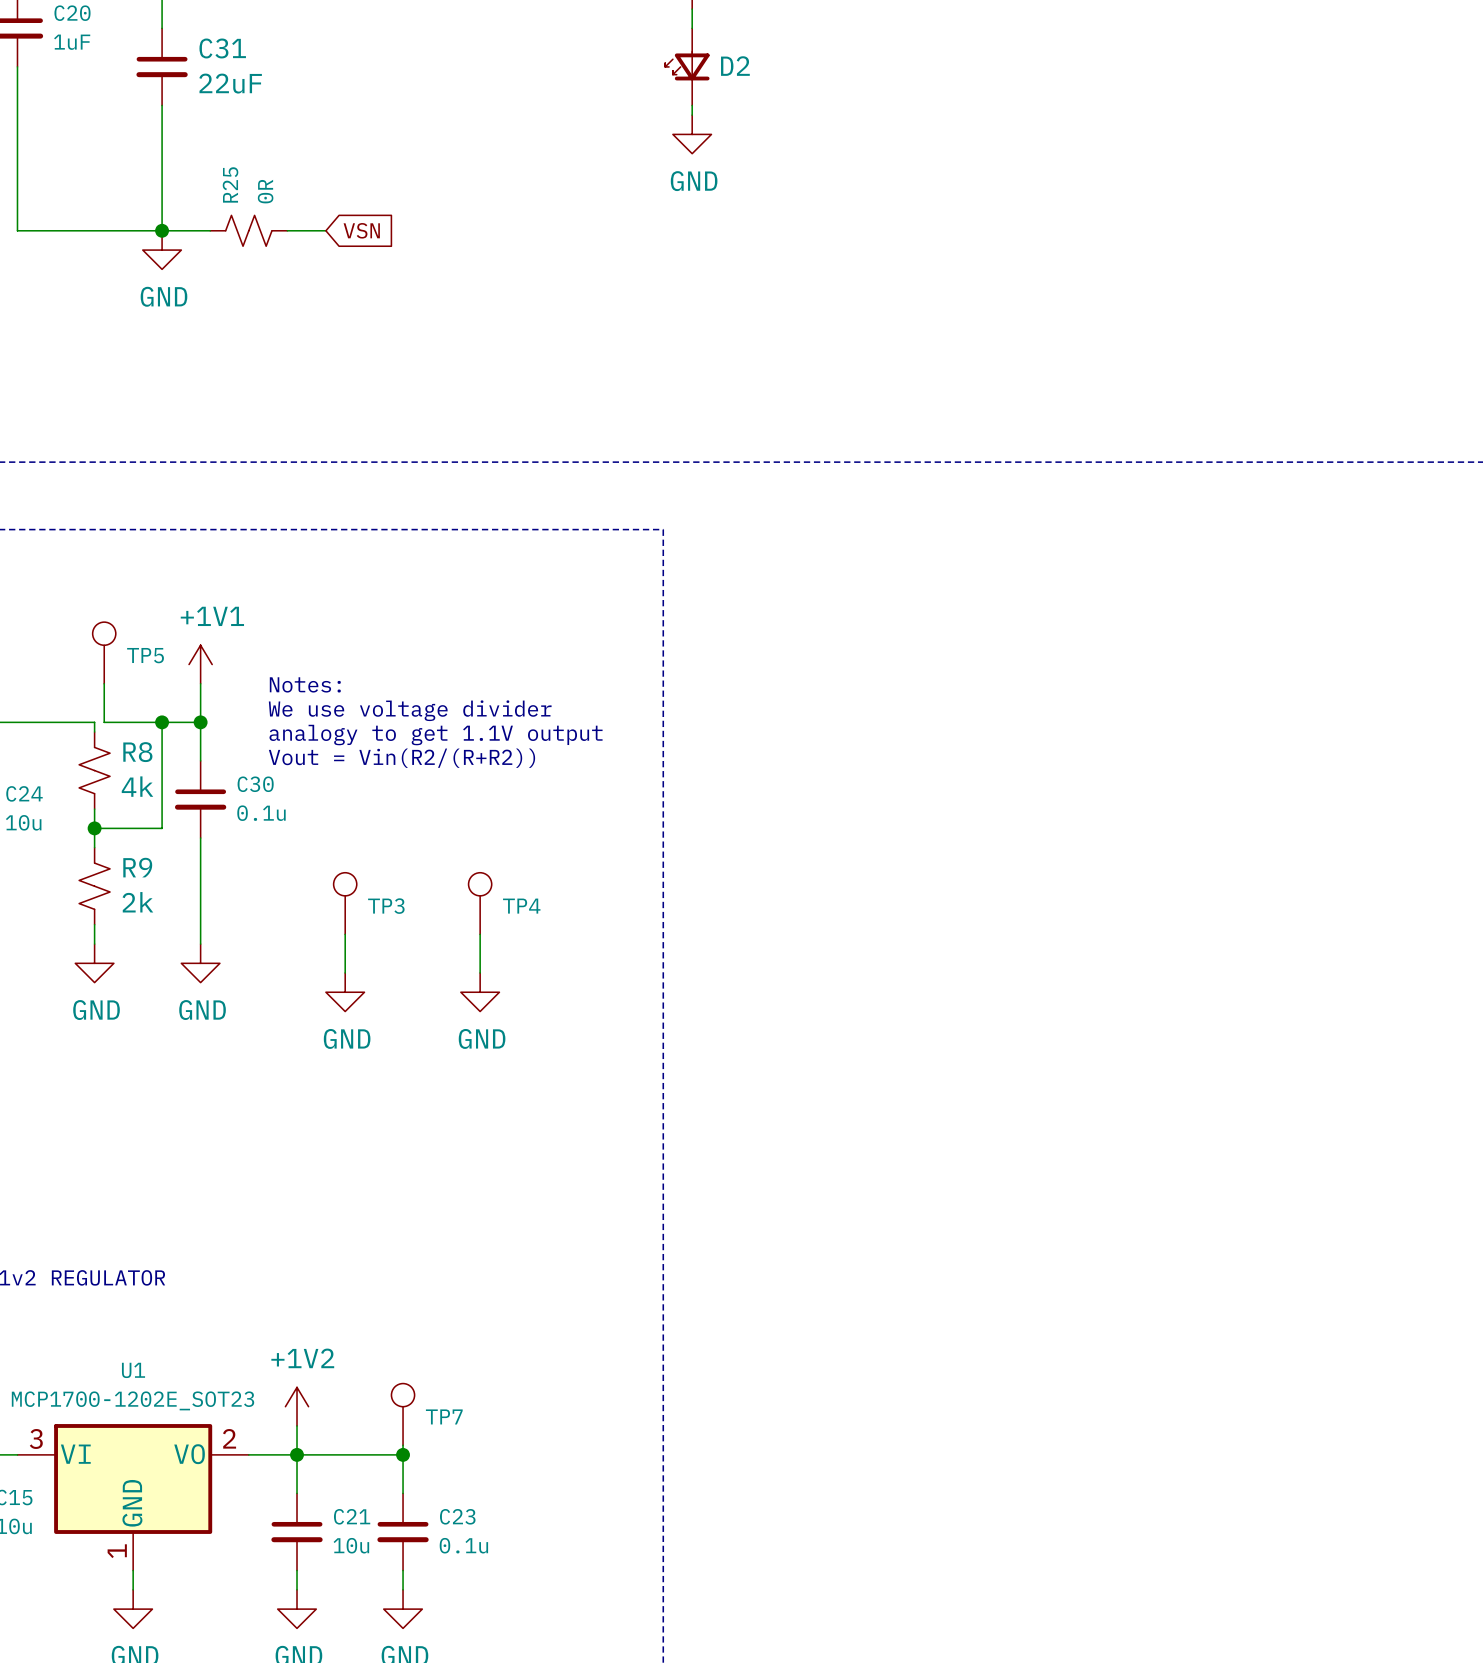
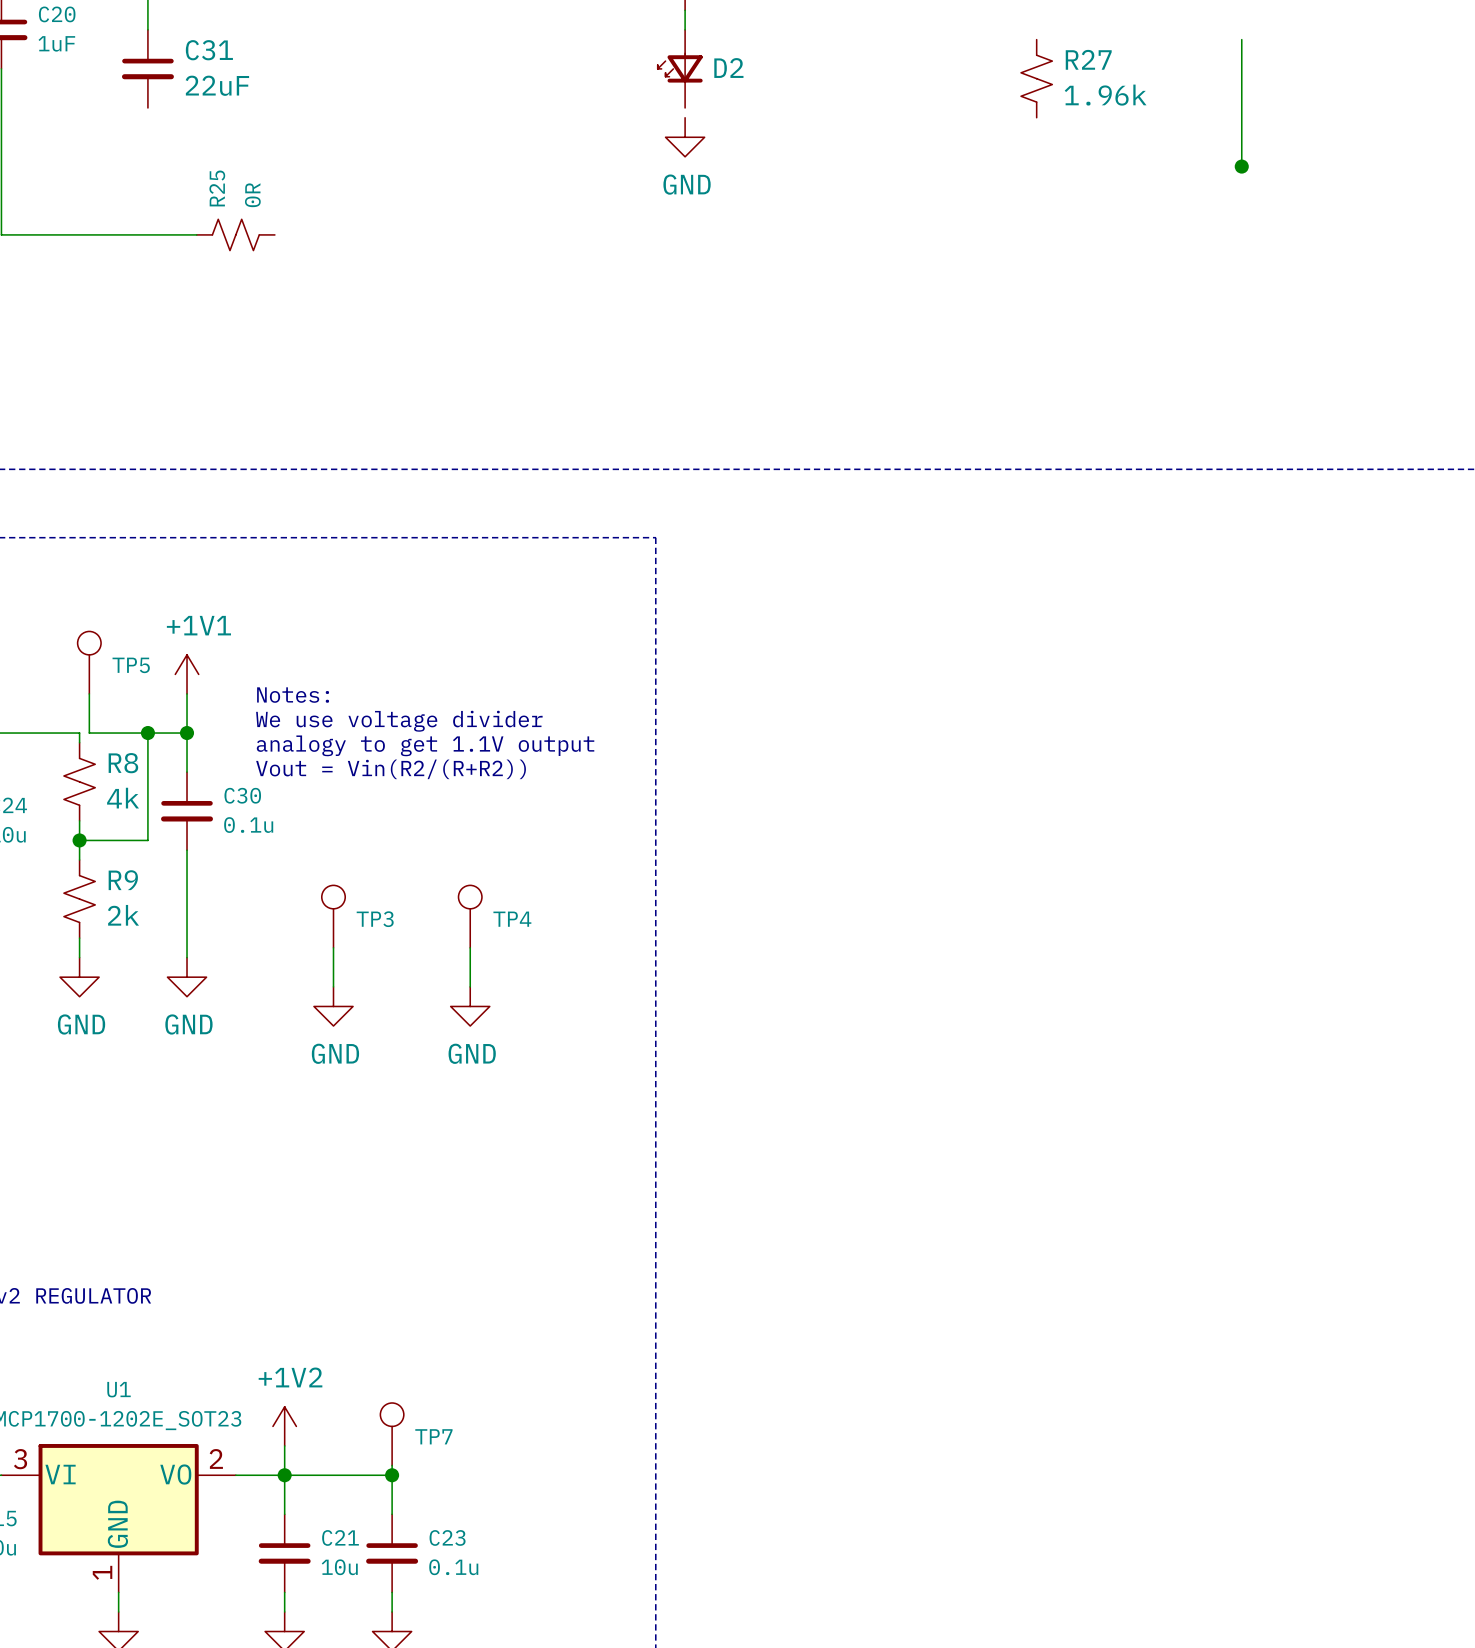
wire: none -> (1241, 39) (1241, 166)
R27: none -> 1.96k (1036, 78)
wire: (162, 105) (162, 230) -> none
wire: (692, 105) (692, 115) -> none
junction: none -> (1241, 166)
junction: (162, 230) -> none
wire: (287, 230) (325, 230) -> none
global label: VSN (361, 230) -> none
power symbol: GND (162, 250) -> none

